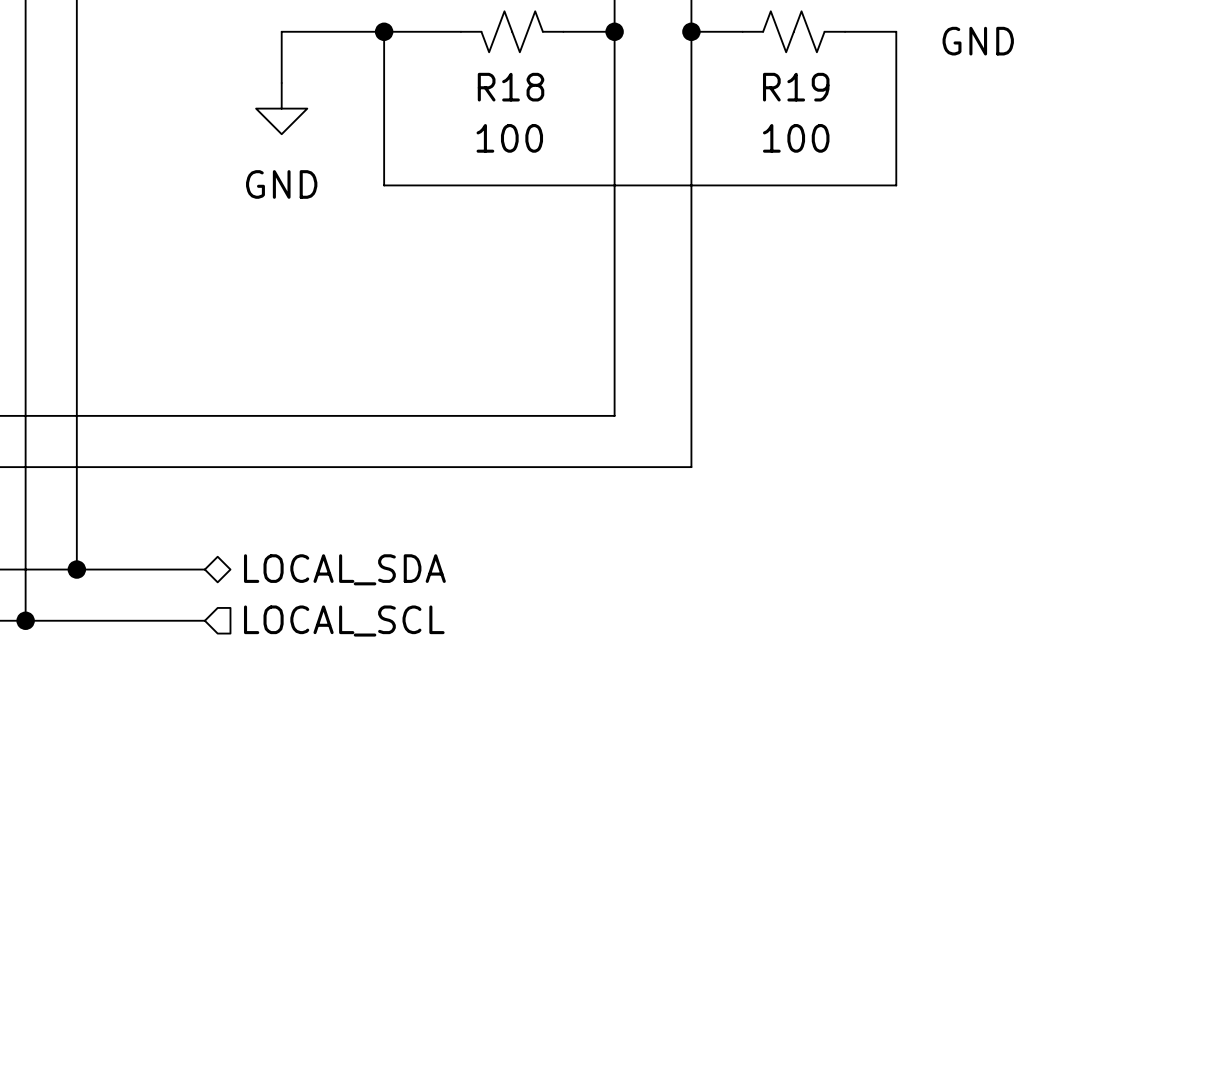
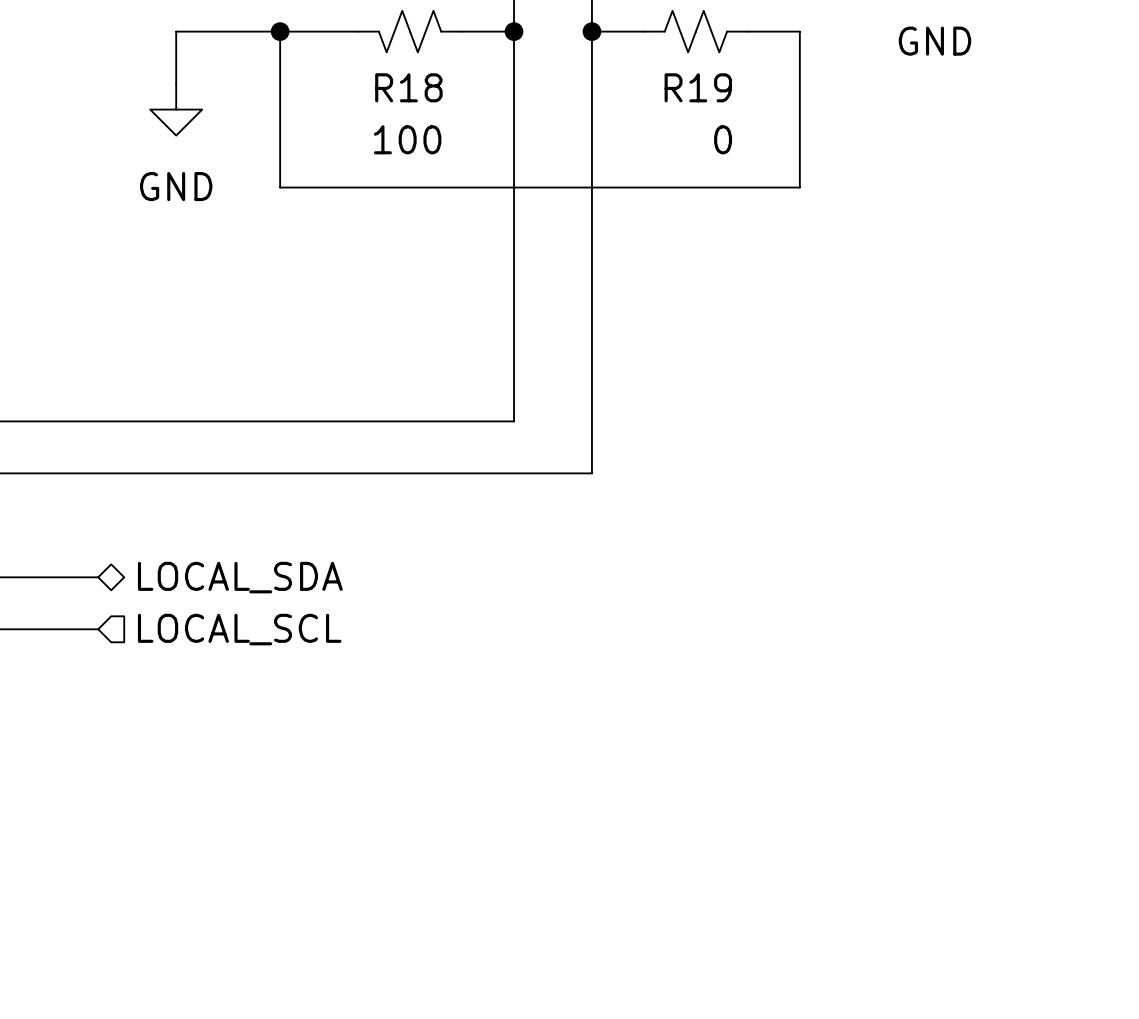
text position: GND (978, 41) -> GND (934, 41)
R19 value: 100 (796, 138) -> 0 (723, 139)

